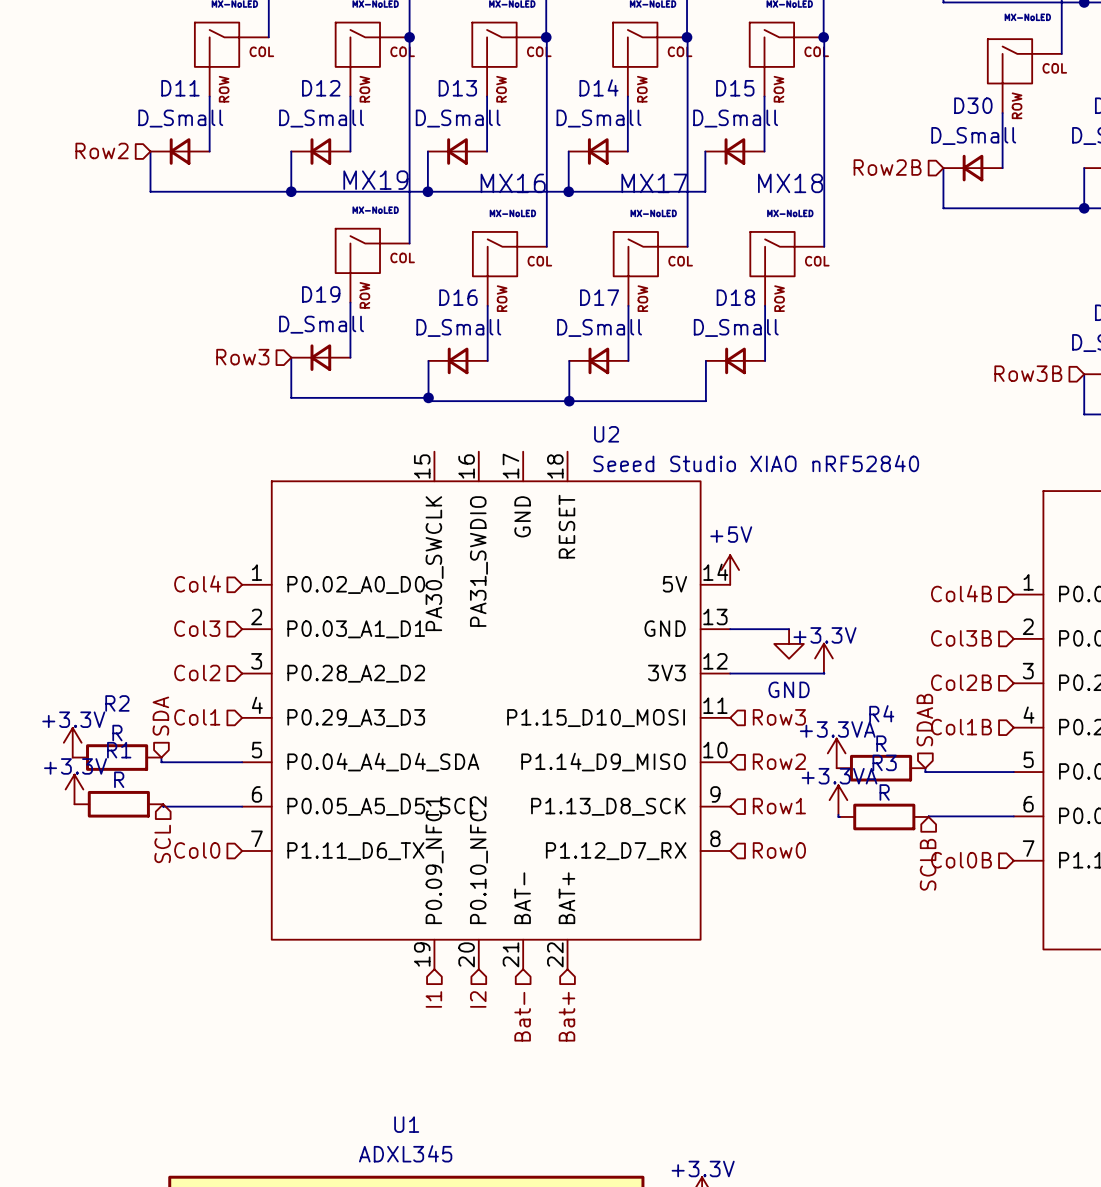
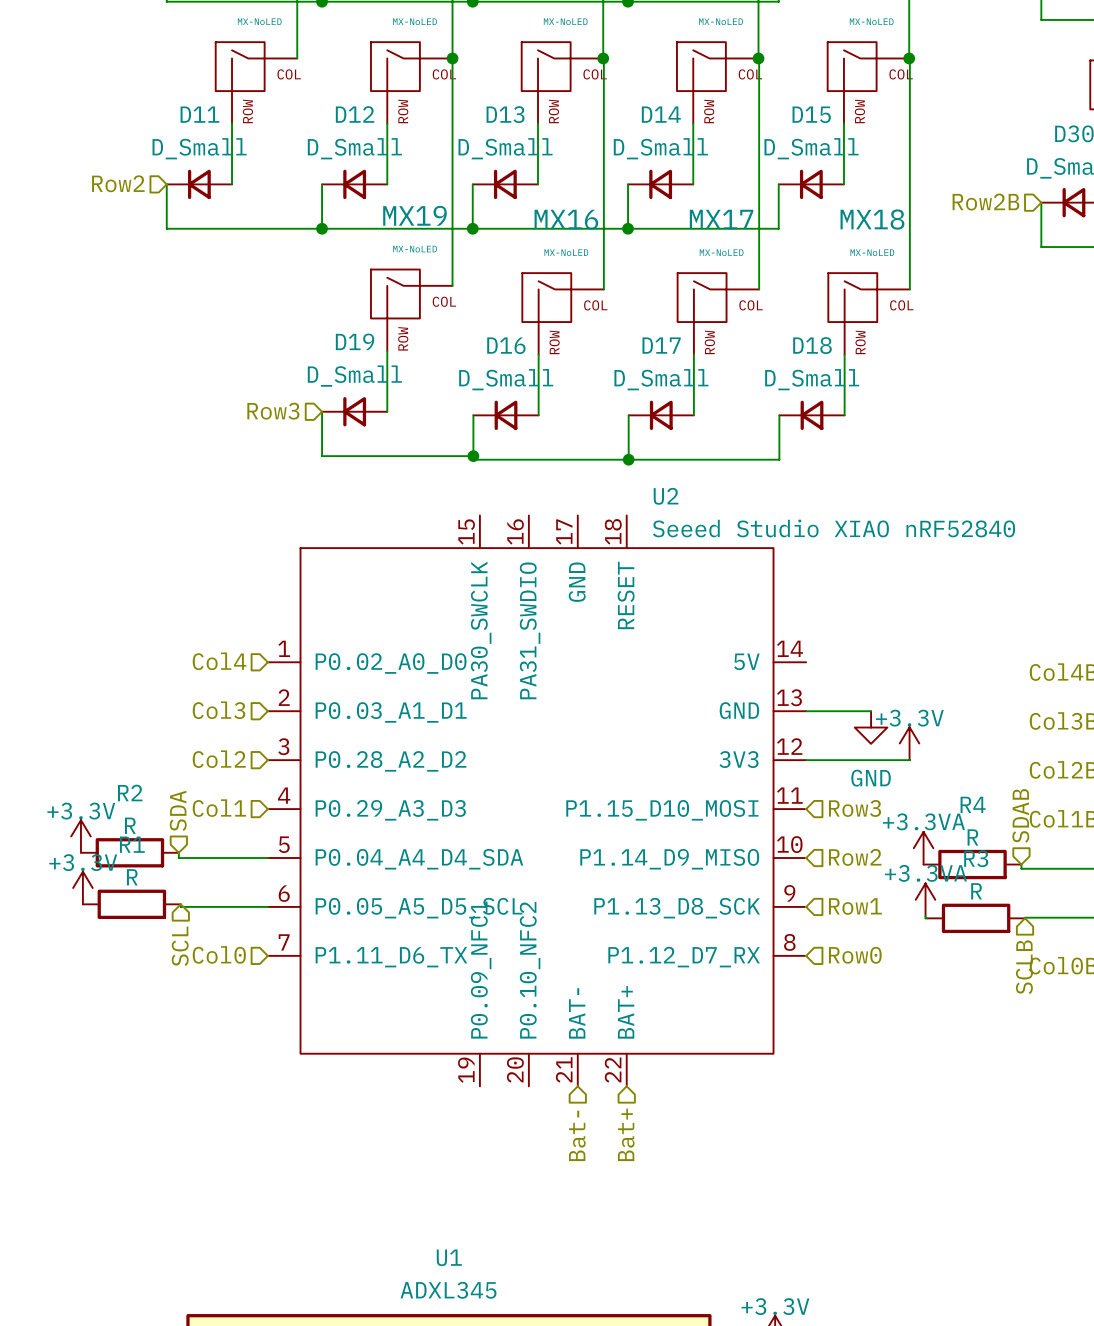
power symbol: +5V (730, 570) -> none
hierarchical label: I1 (433, 999) -> none
hierarchical label: I2 (478, 999) -> none

